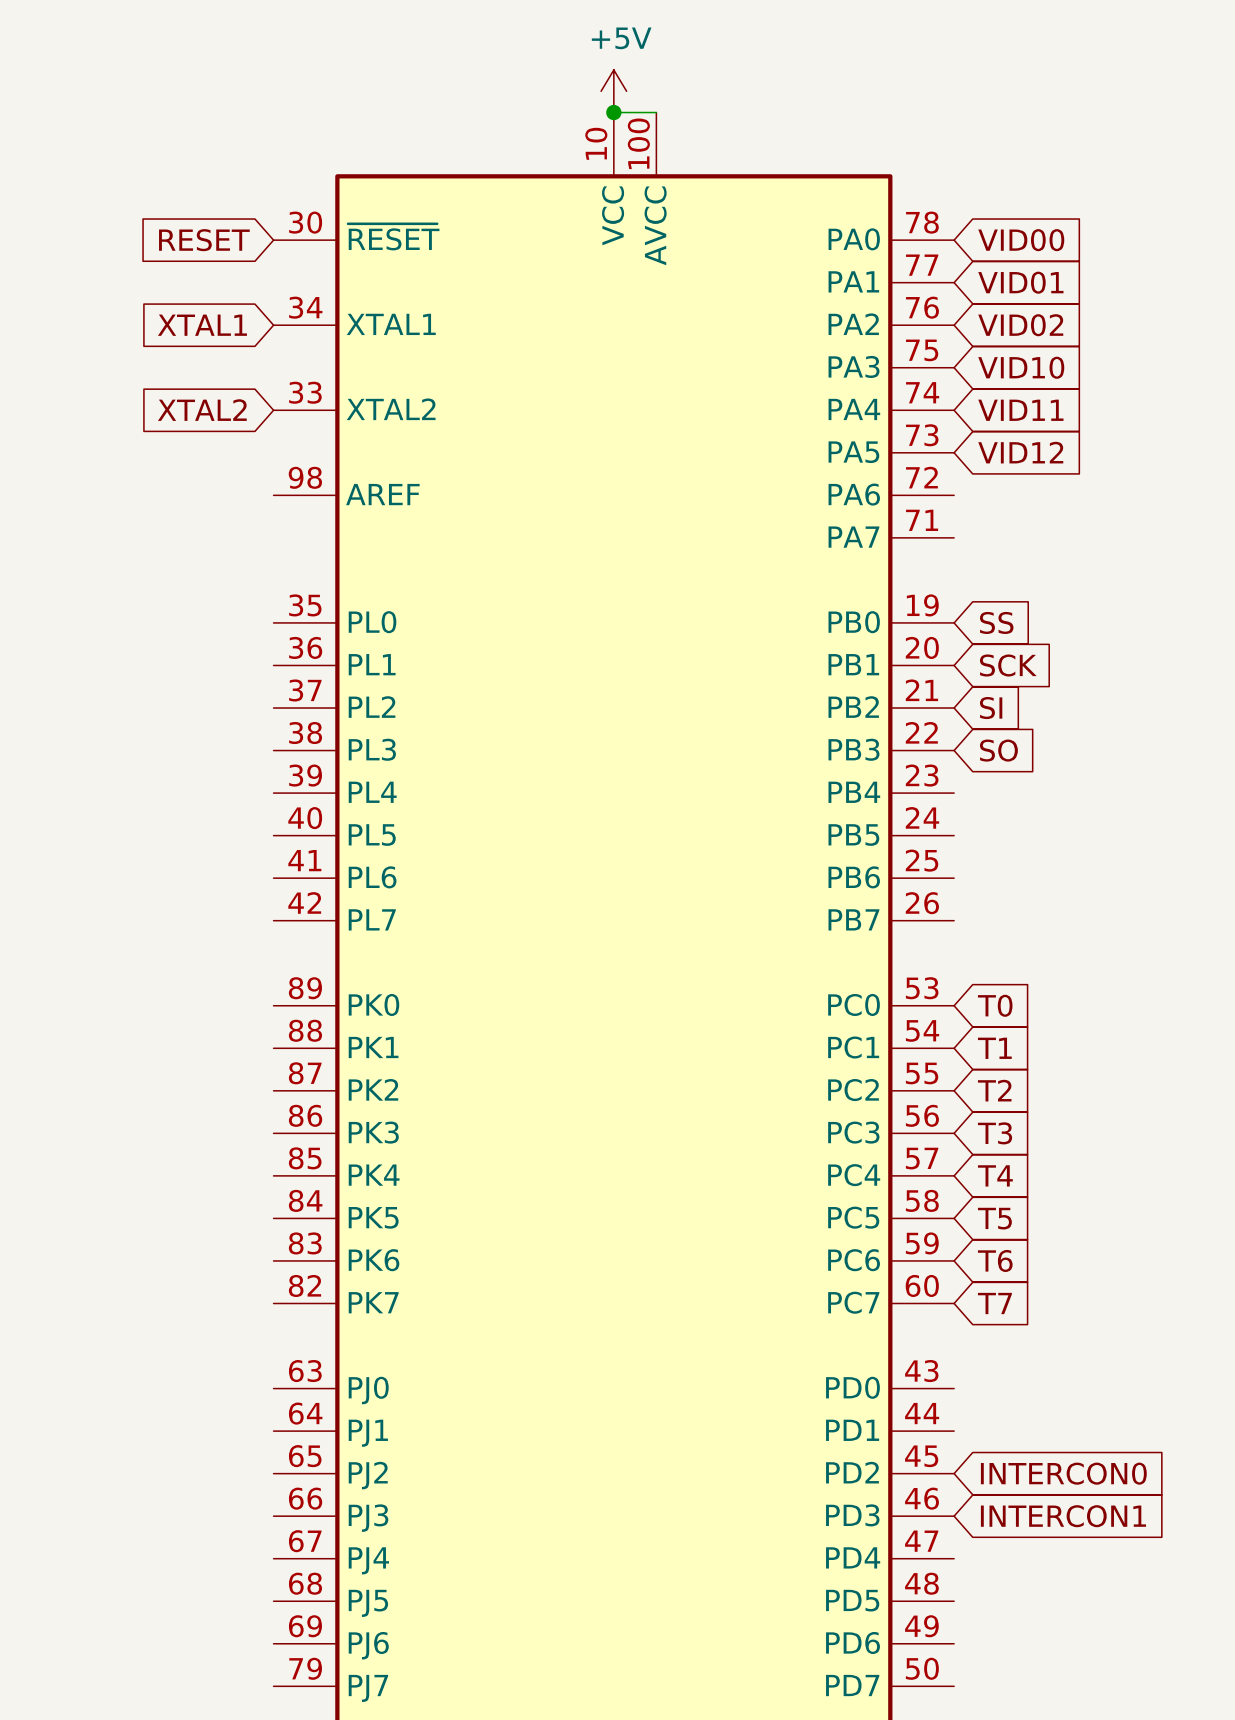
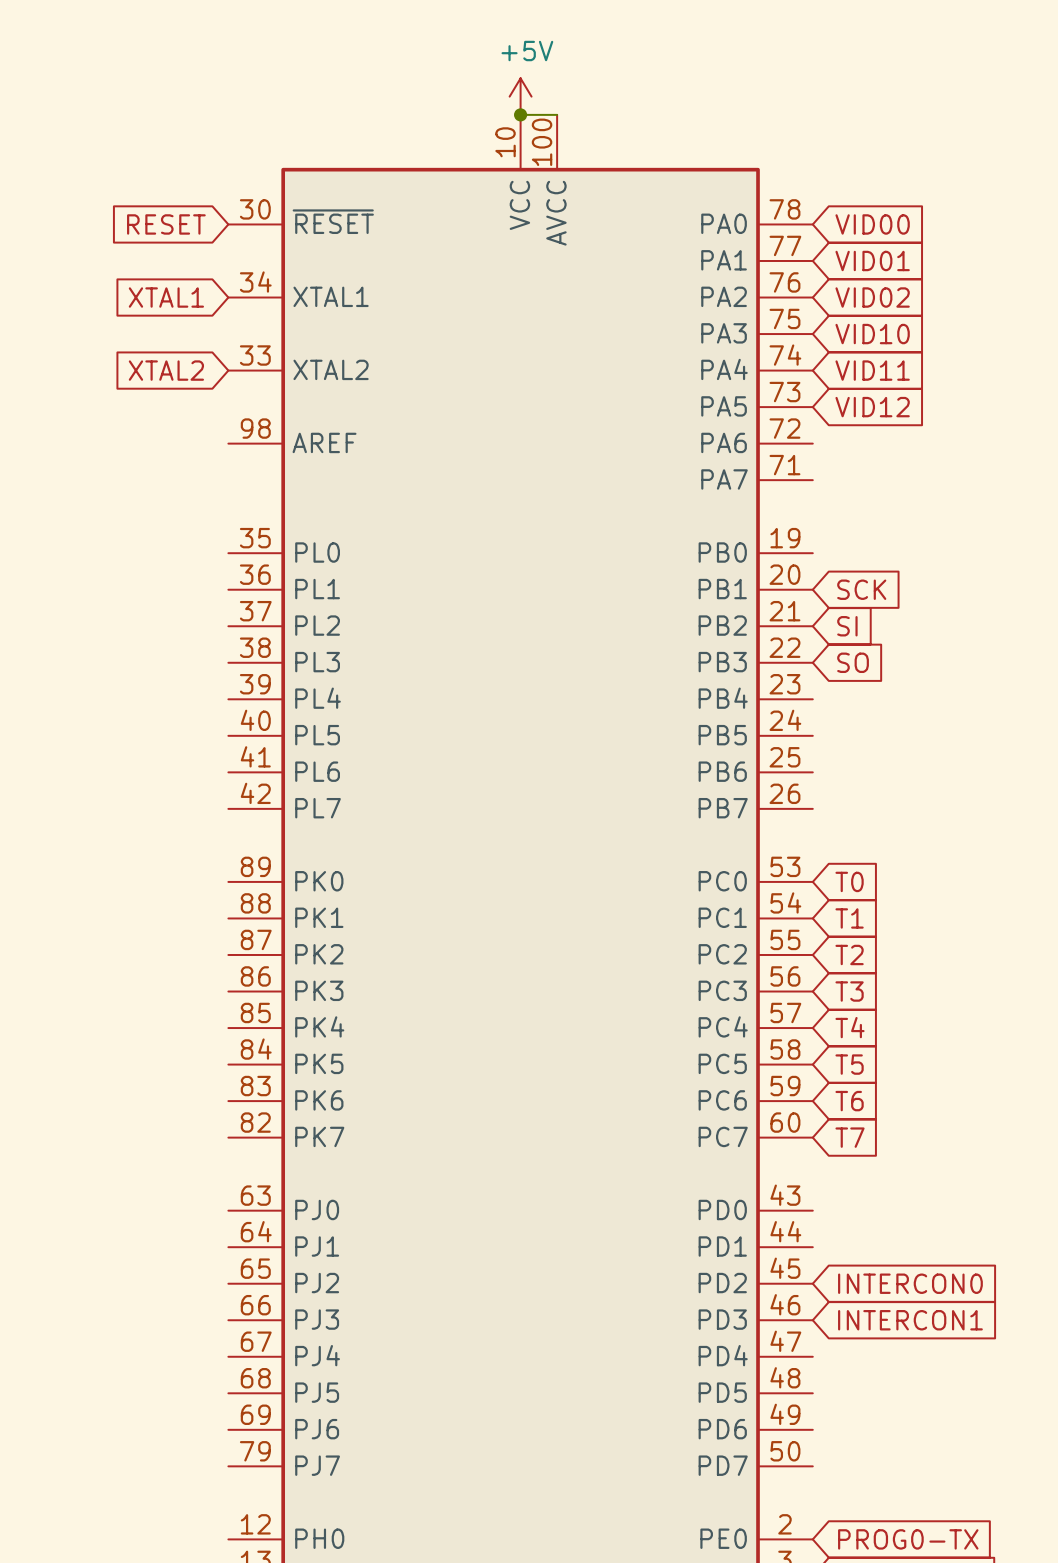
global label: SS (996, 622) -> none

